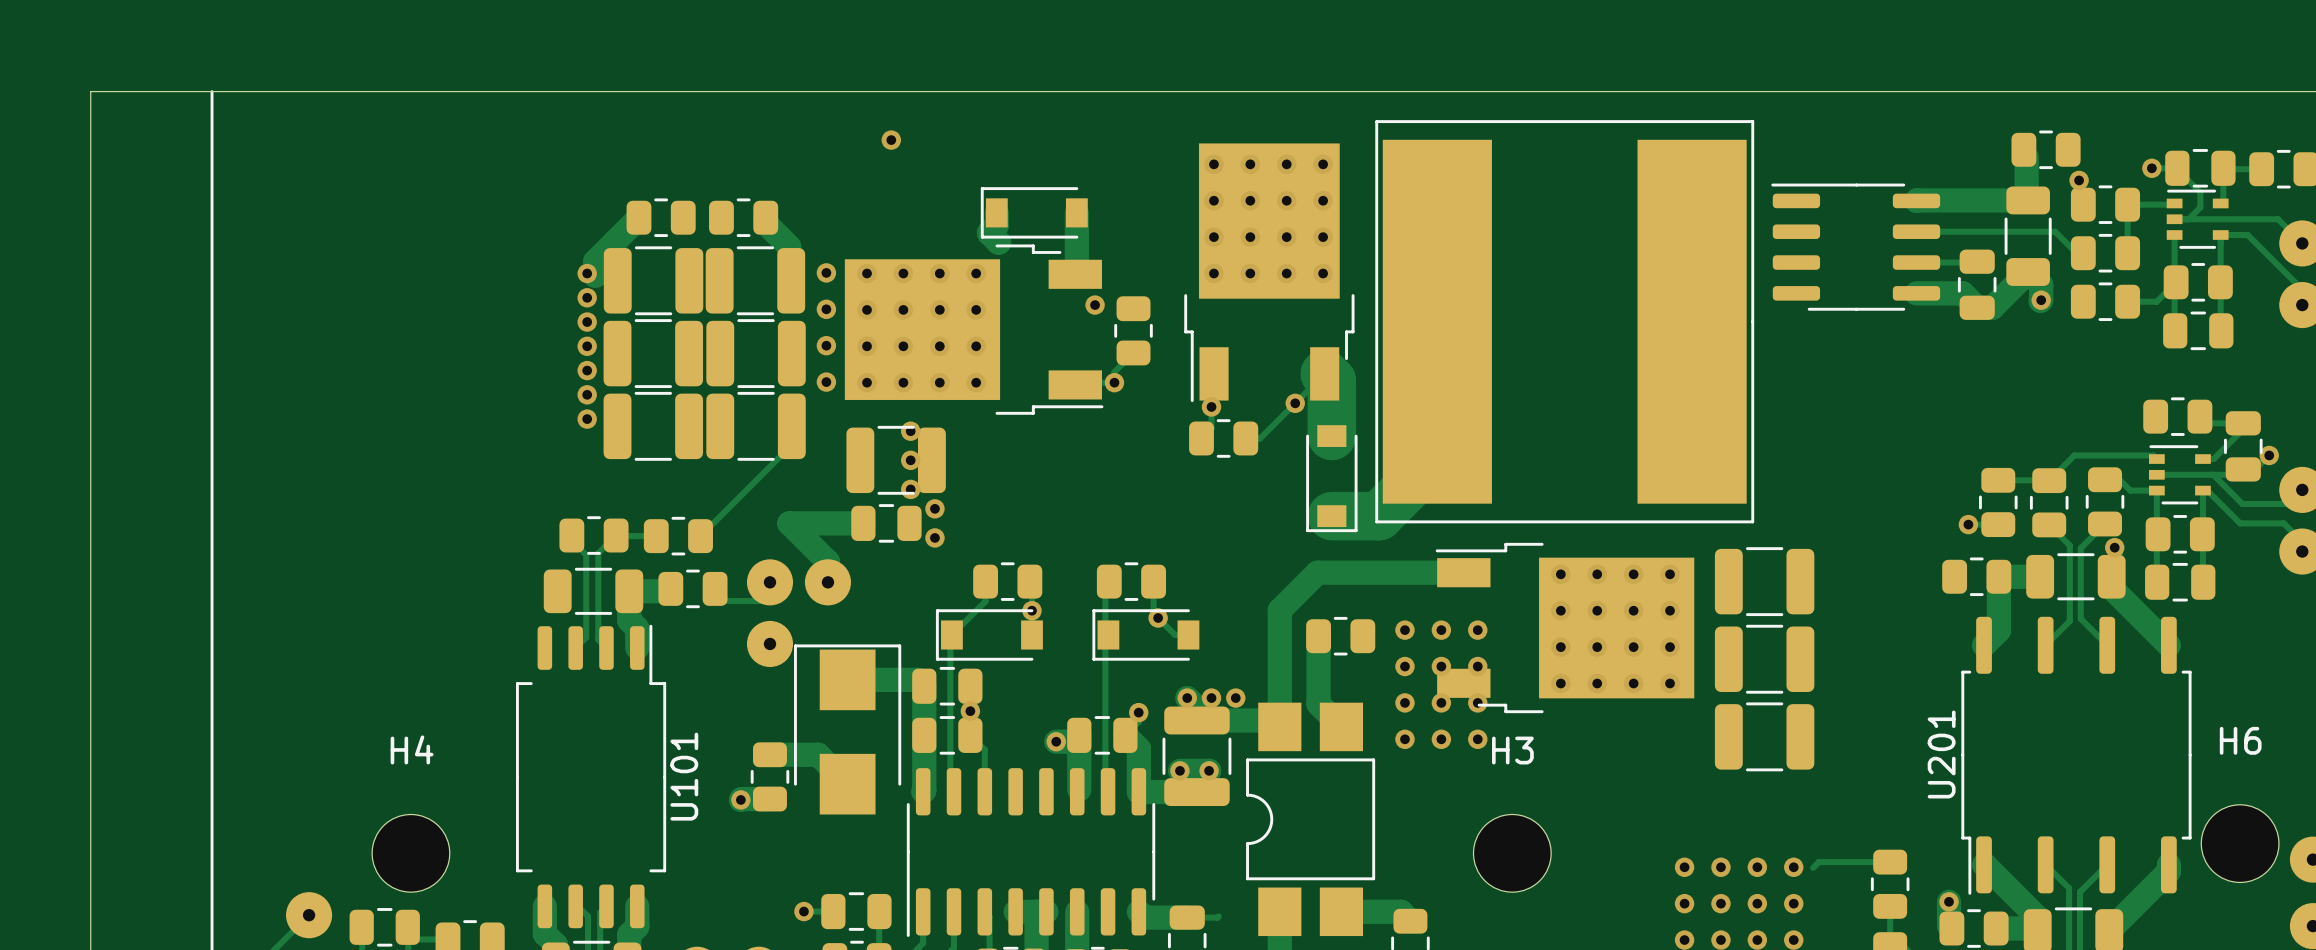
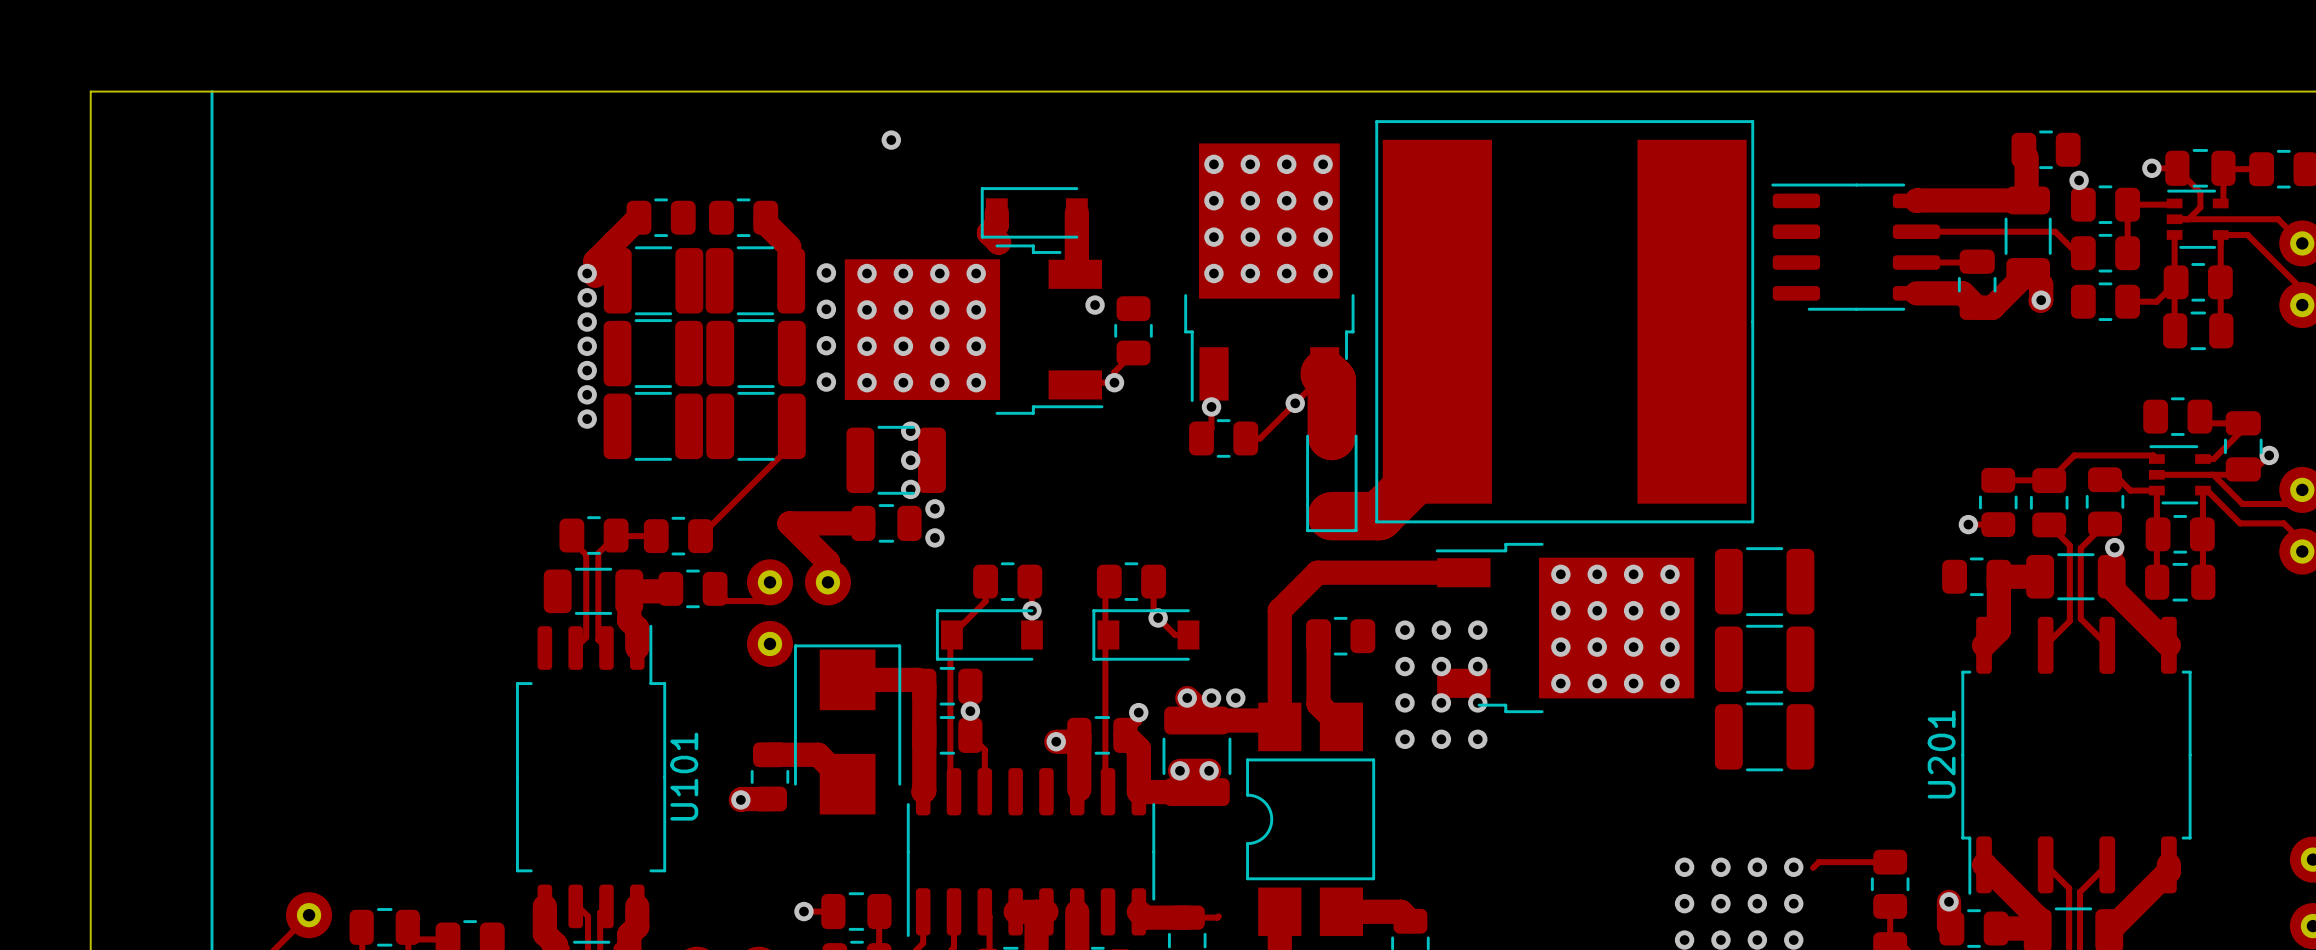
H6: (2240, 843) -> none
H4: (410, 853) -> none
H3: (1512, 853) -> none

